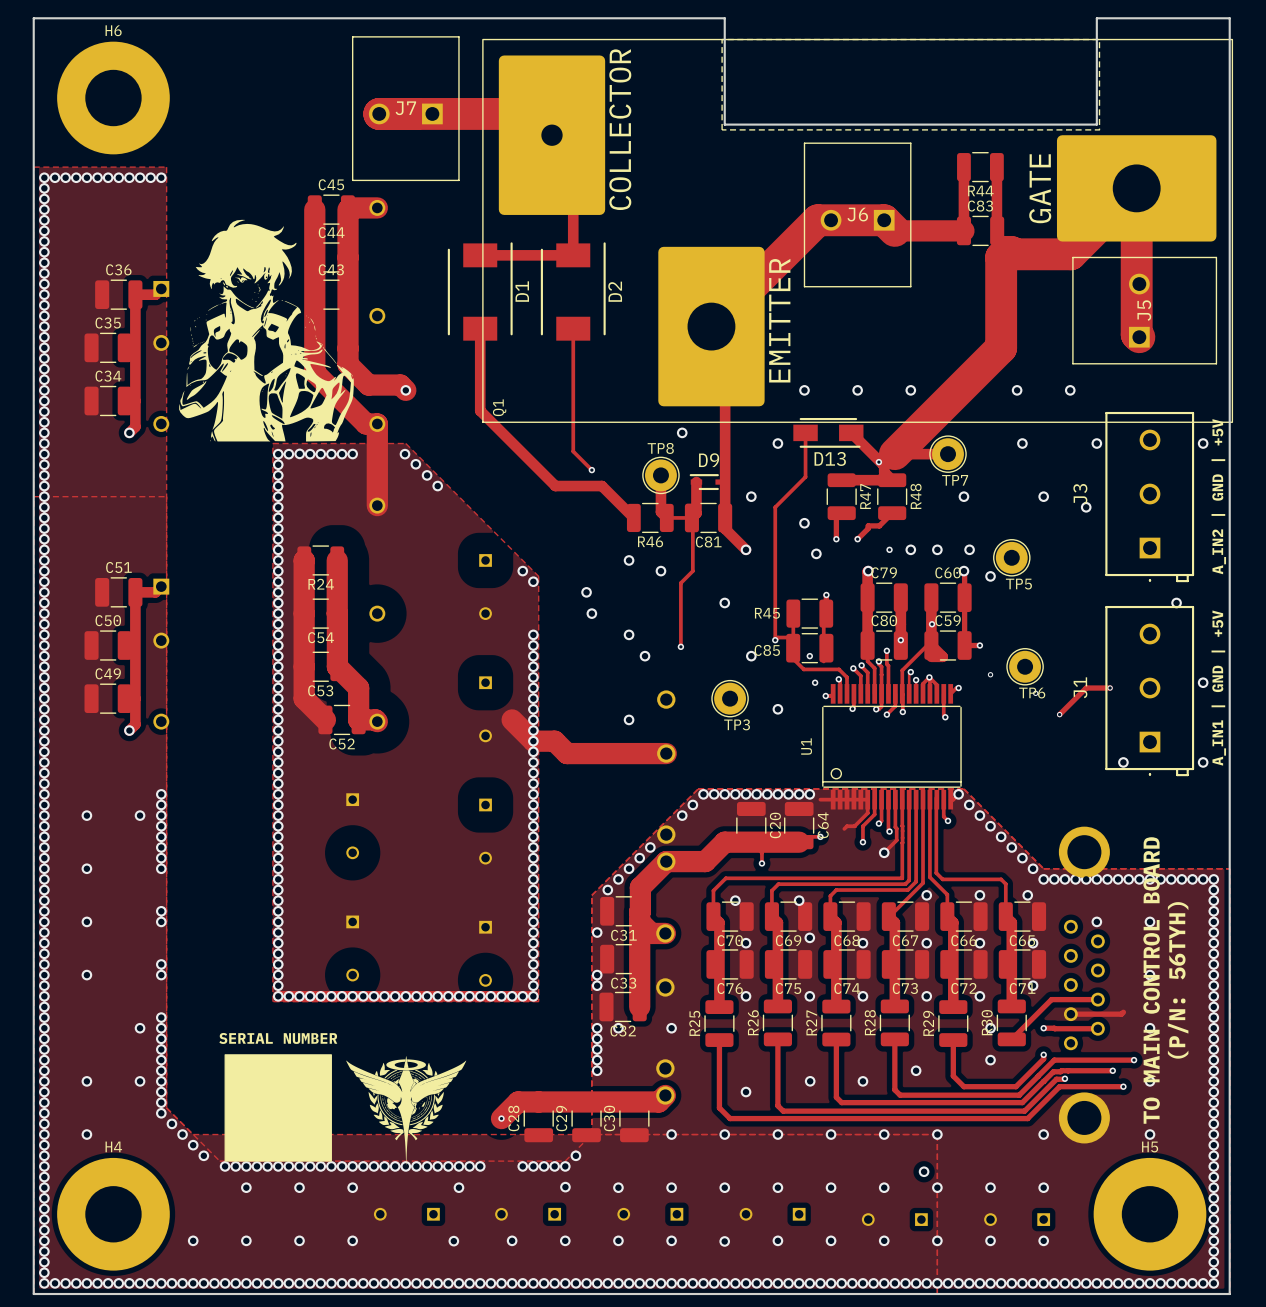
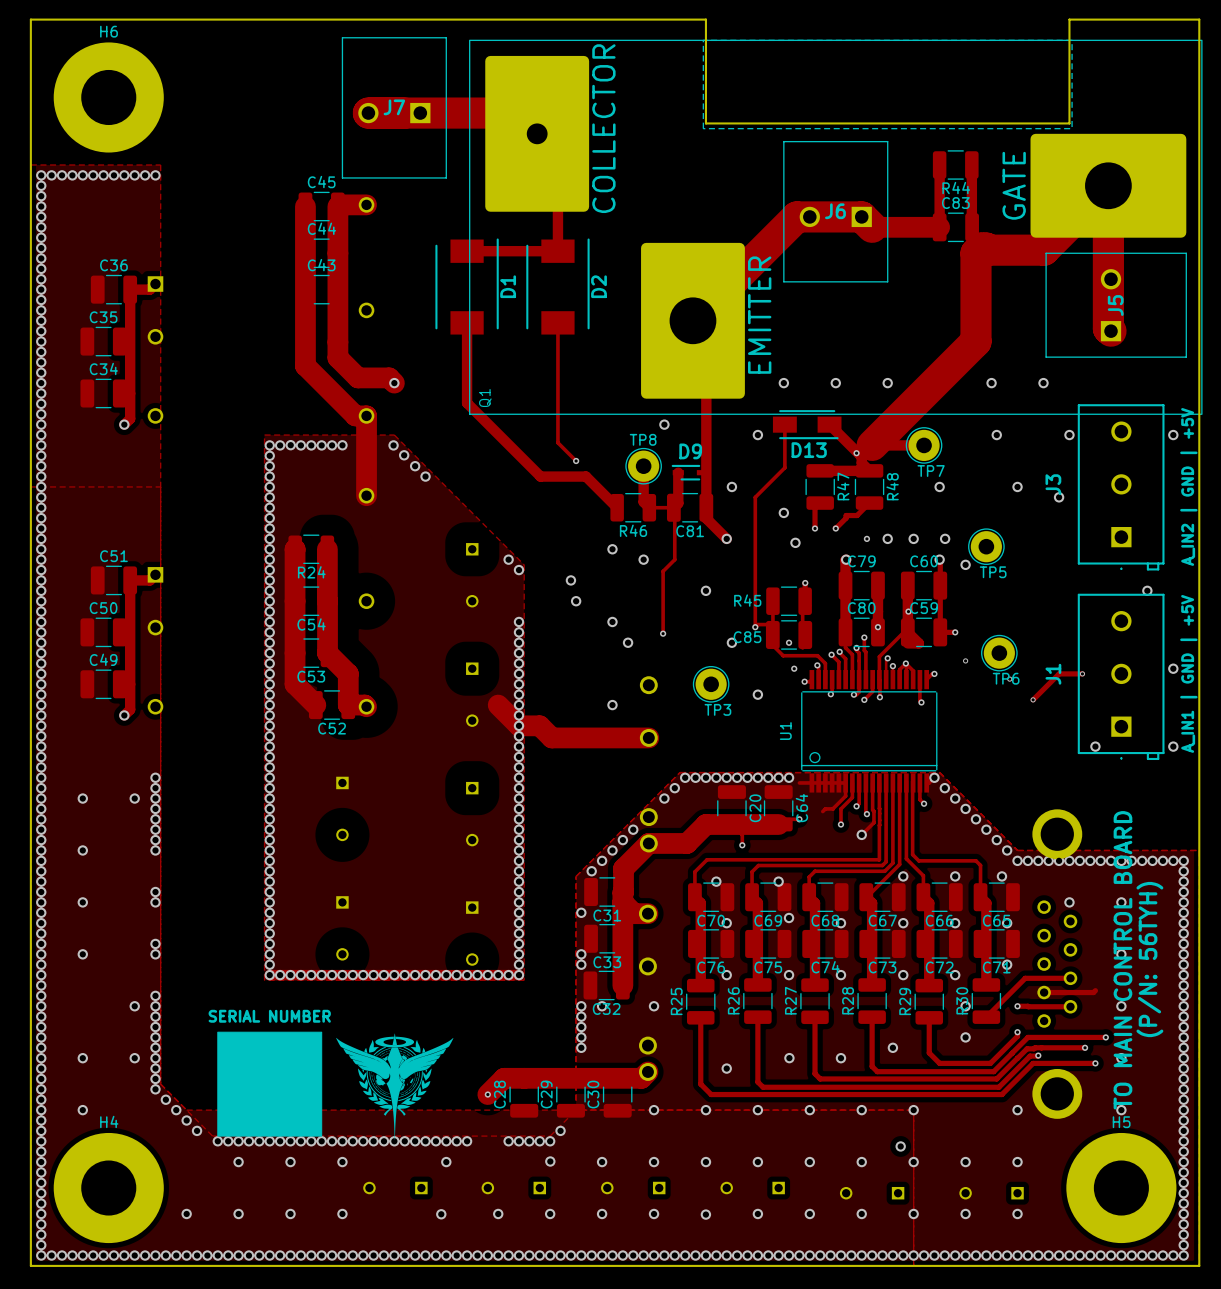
drawing: [179, 219, 354, 442] -> none

